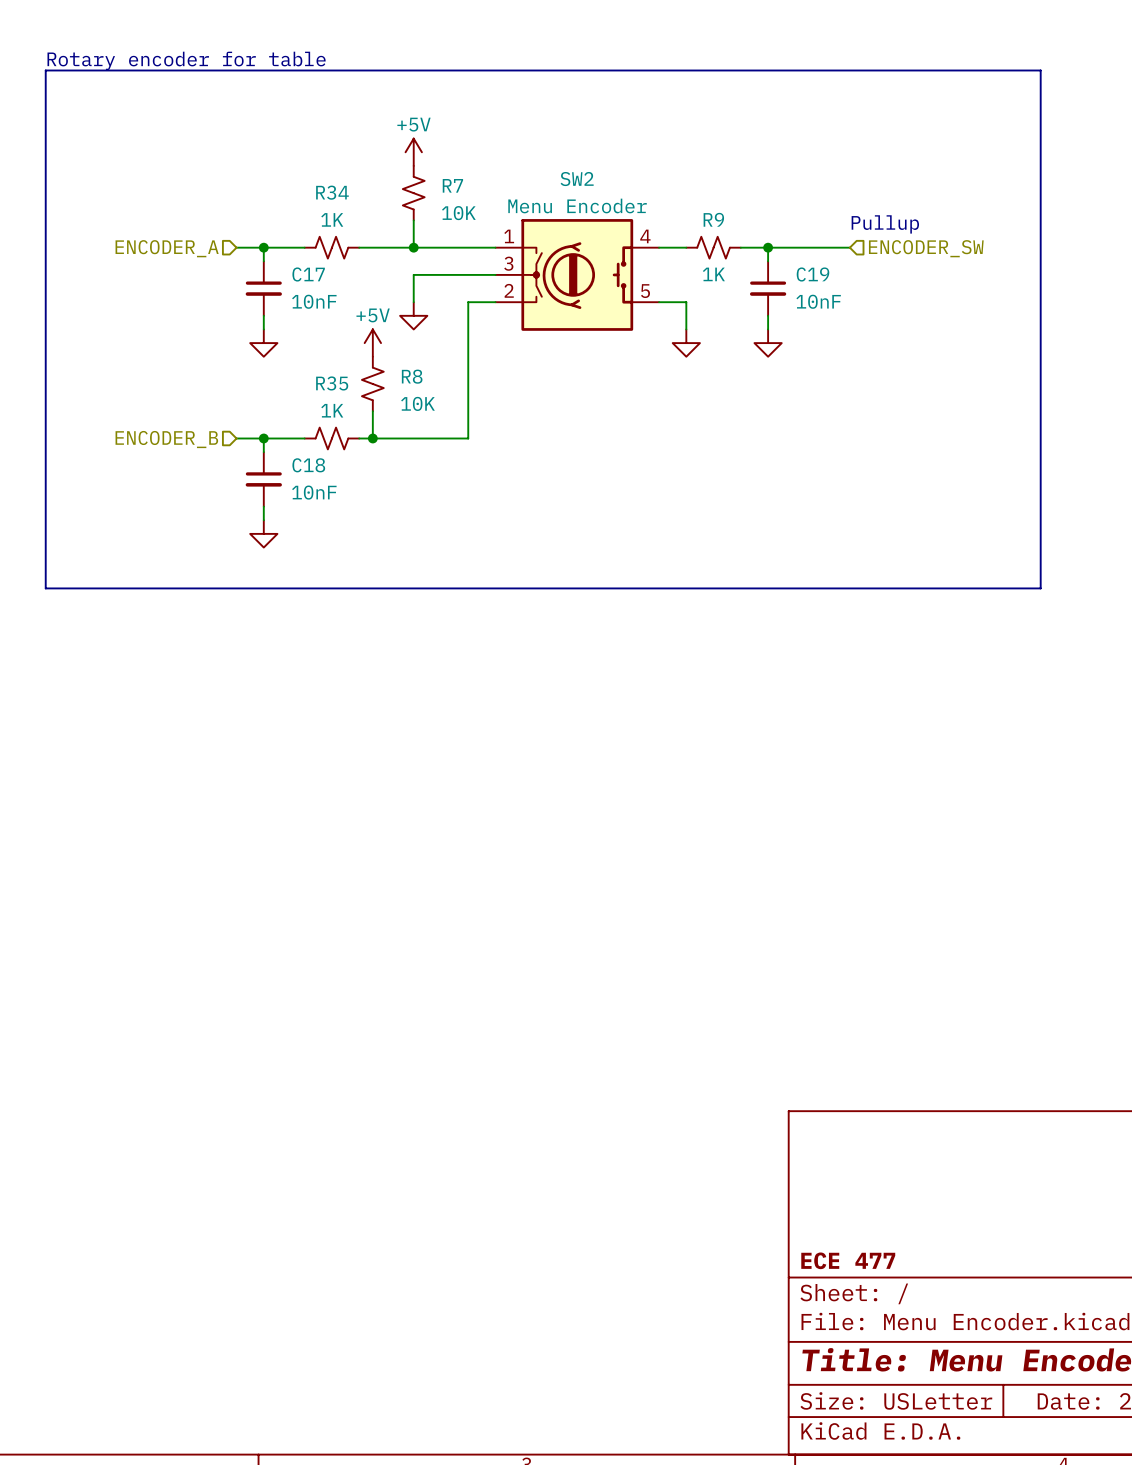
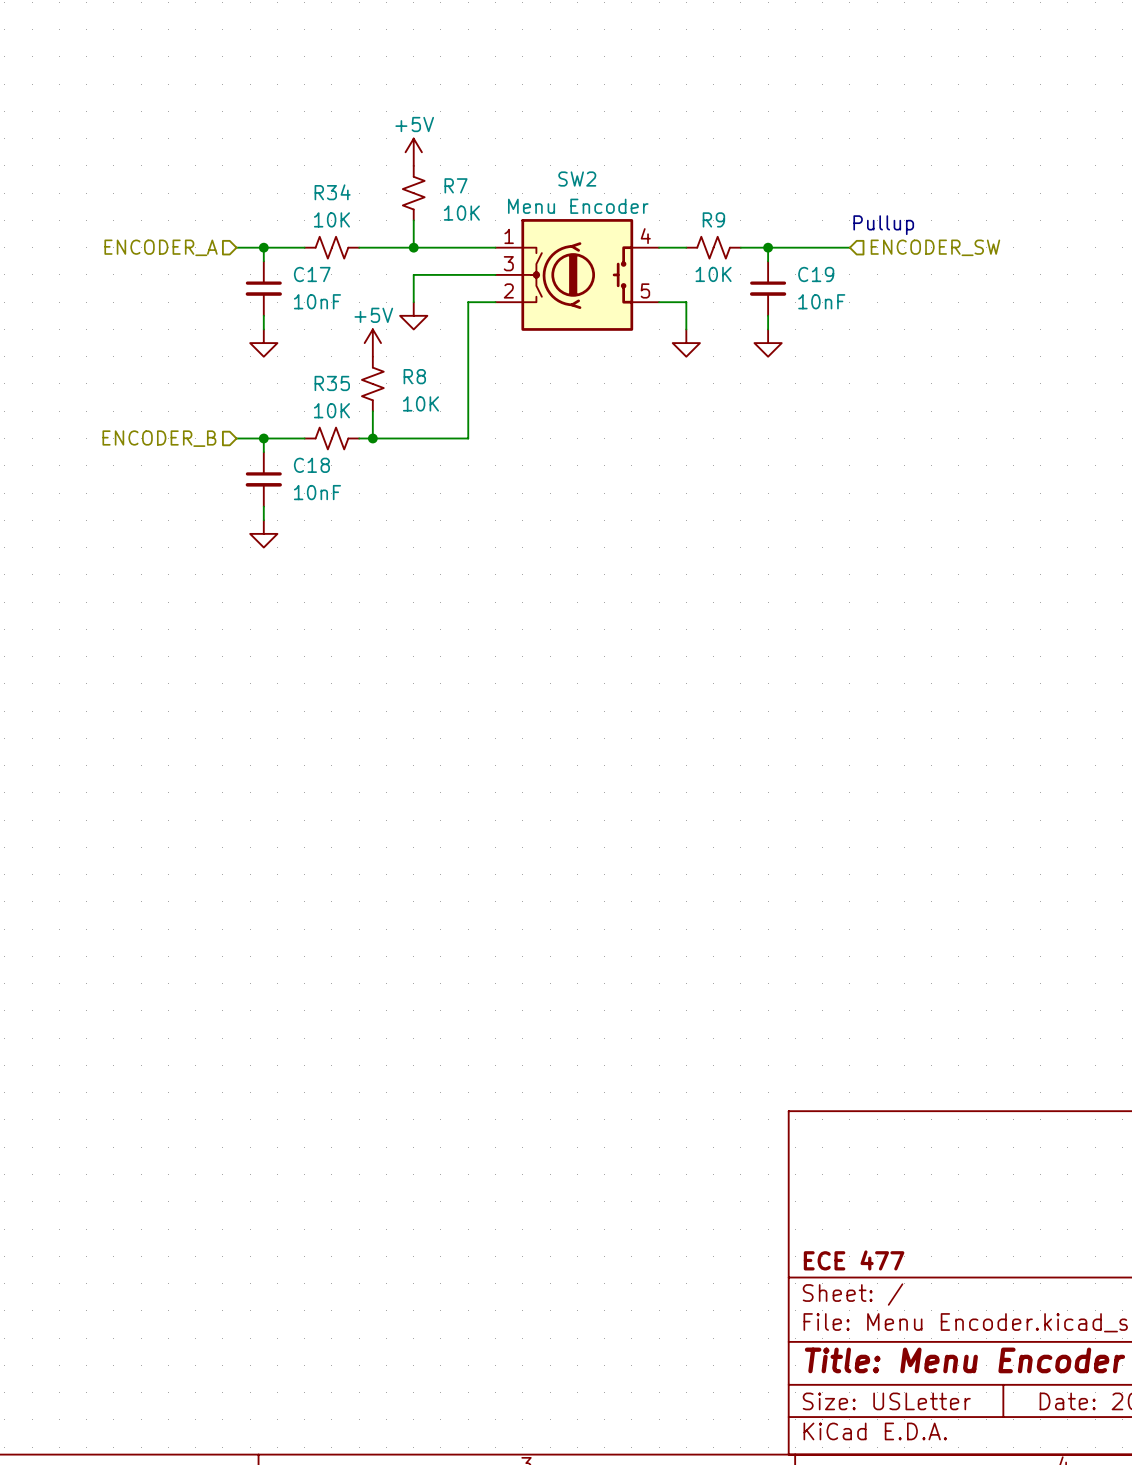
text: Rotary encoder for table (186, 60) -> none
line: (45, 70) (1040, 70) (1040, 588) (45, 588) (45, 70) -> none
R34 value: 1K (332, 219) -> 10K (331, 219)
R9 value: 1K (713, 274) -> 10K (713, 274)
R35 value: 1K (332, 410) -> 10K (331, 410)

